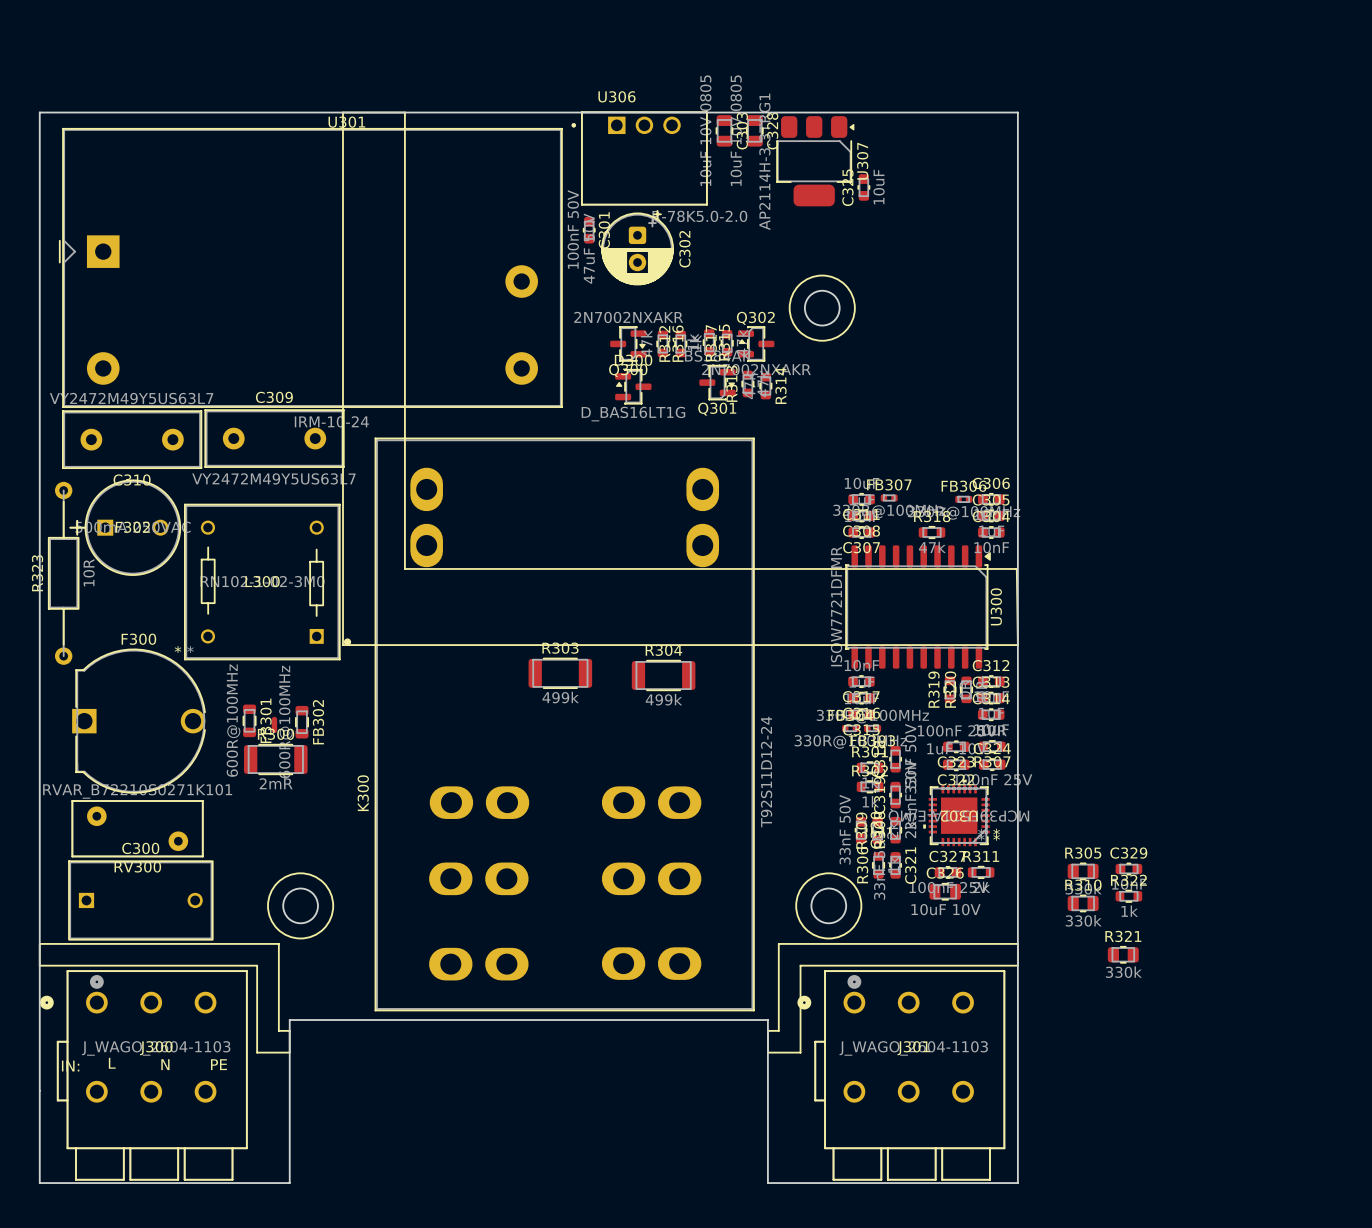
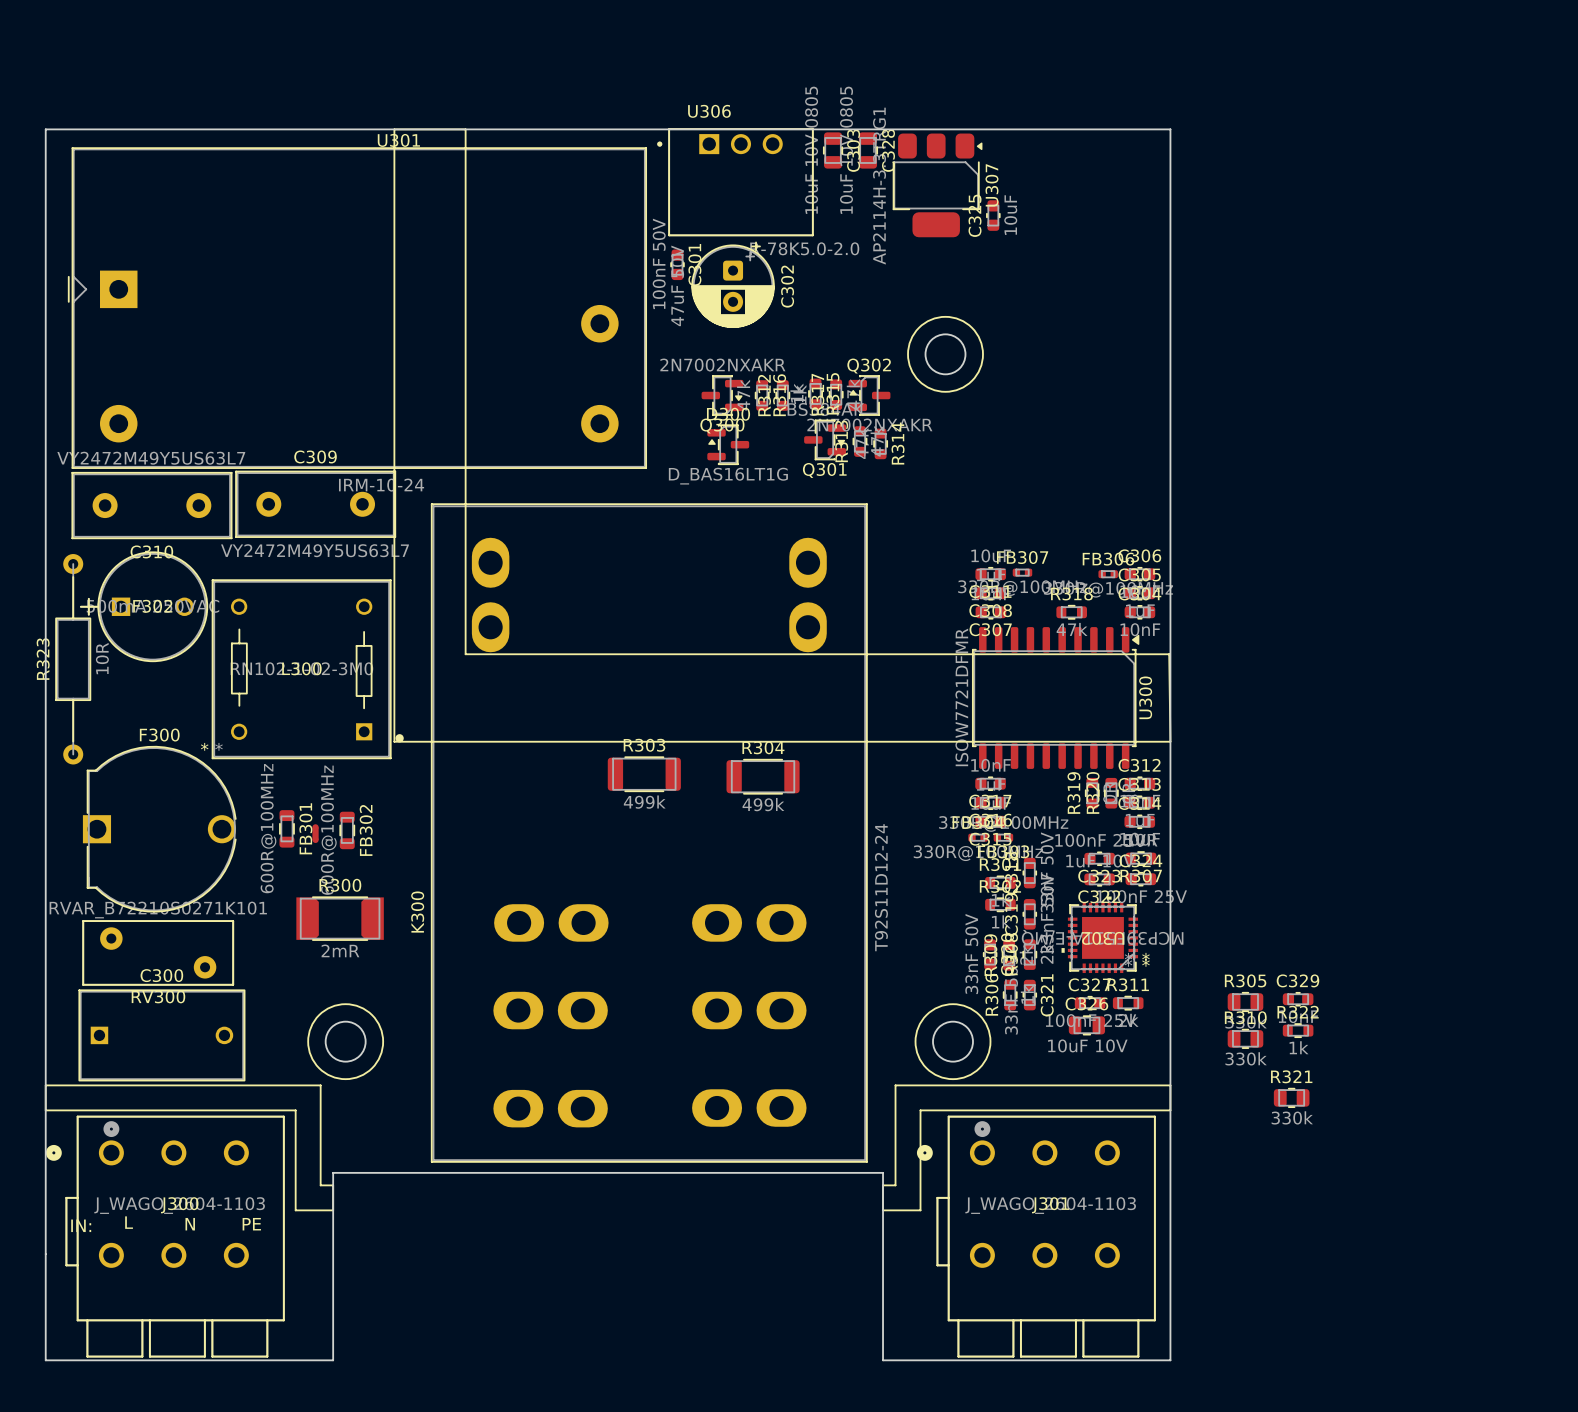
R300 footprint: [244, 744, 308, 775] -> [296, 896, 384, 941]

